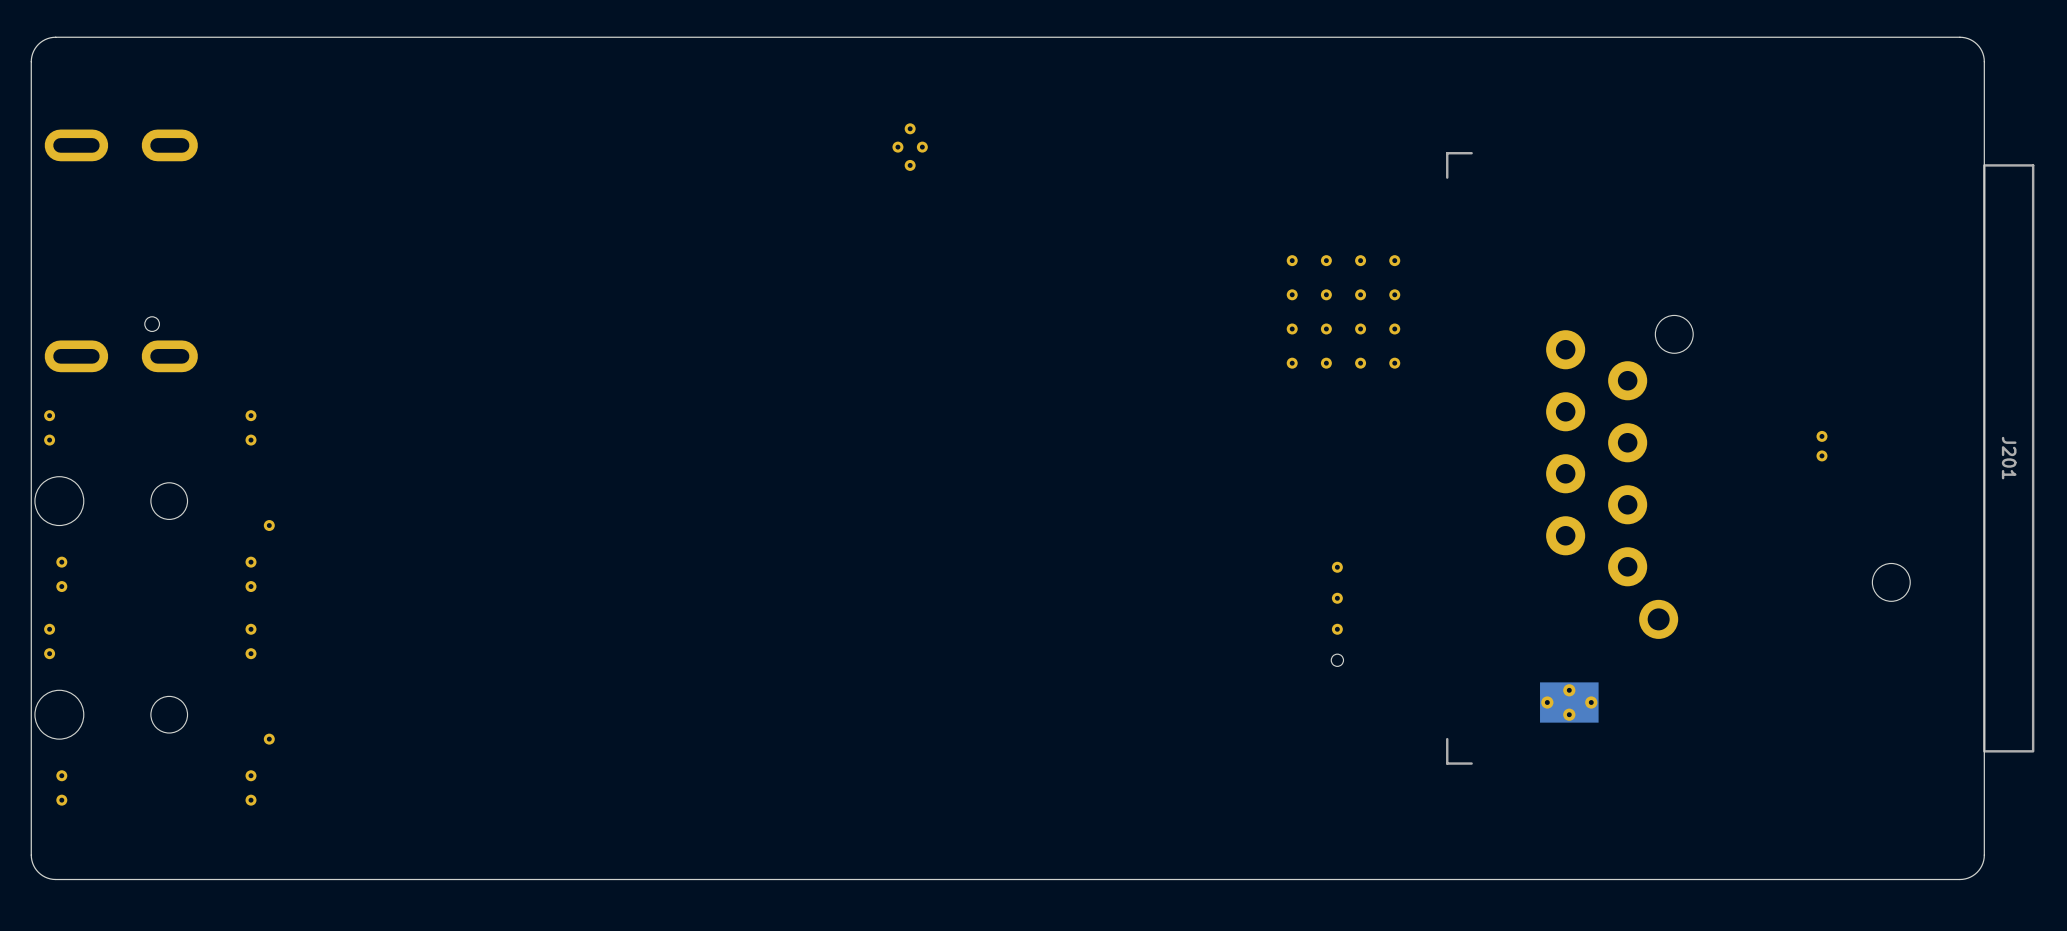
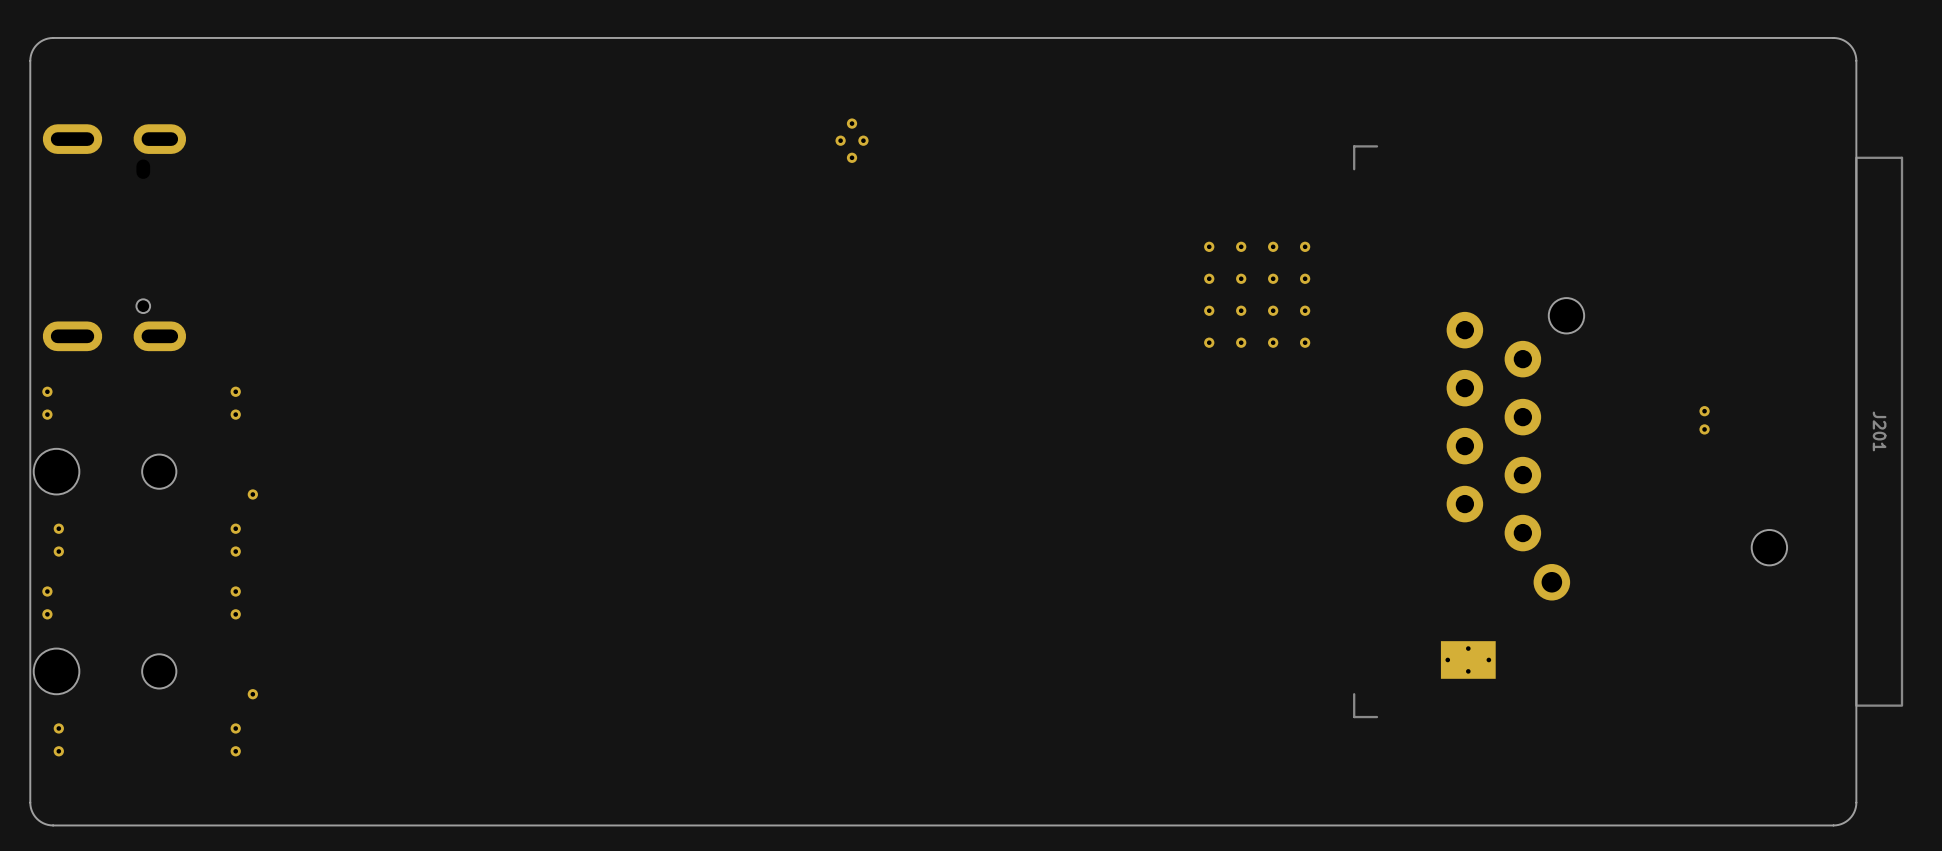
part: (1337, 614) -> none

